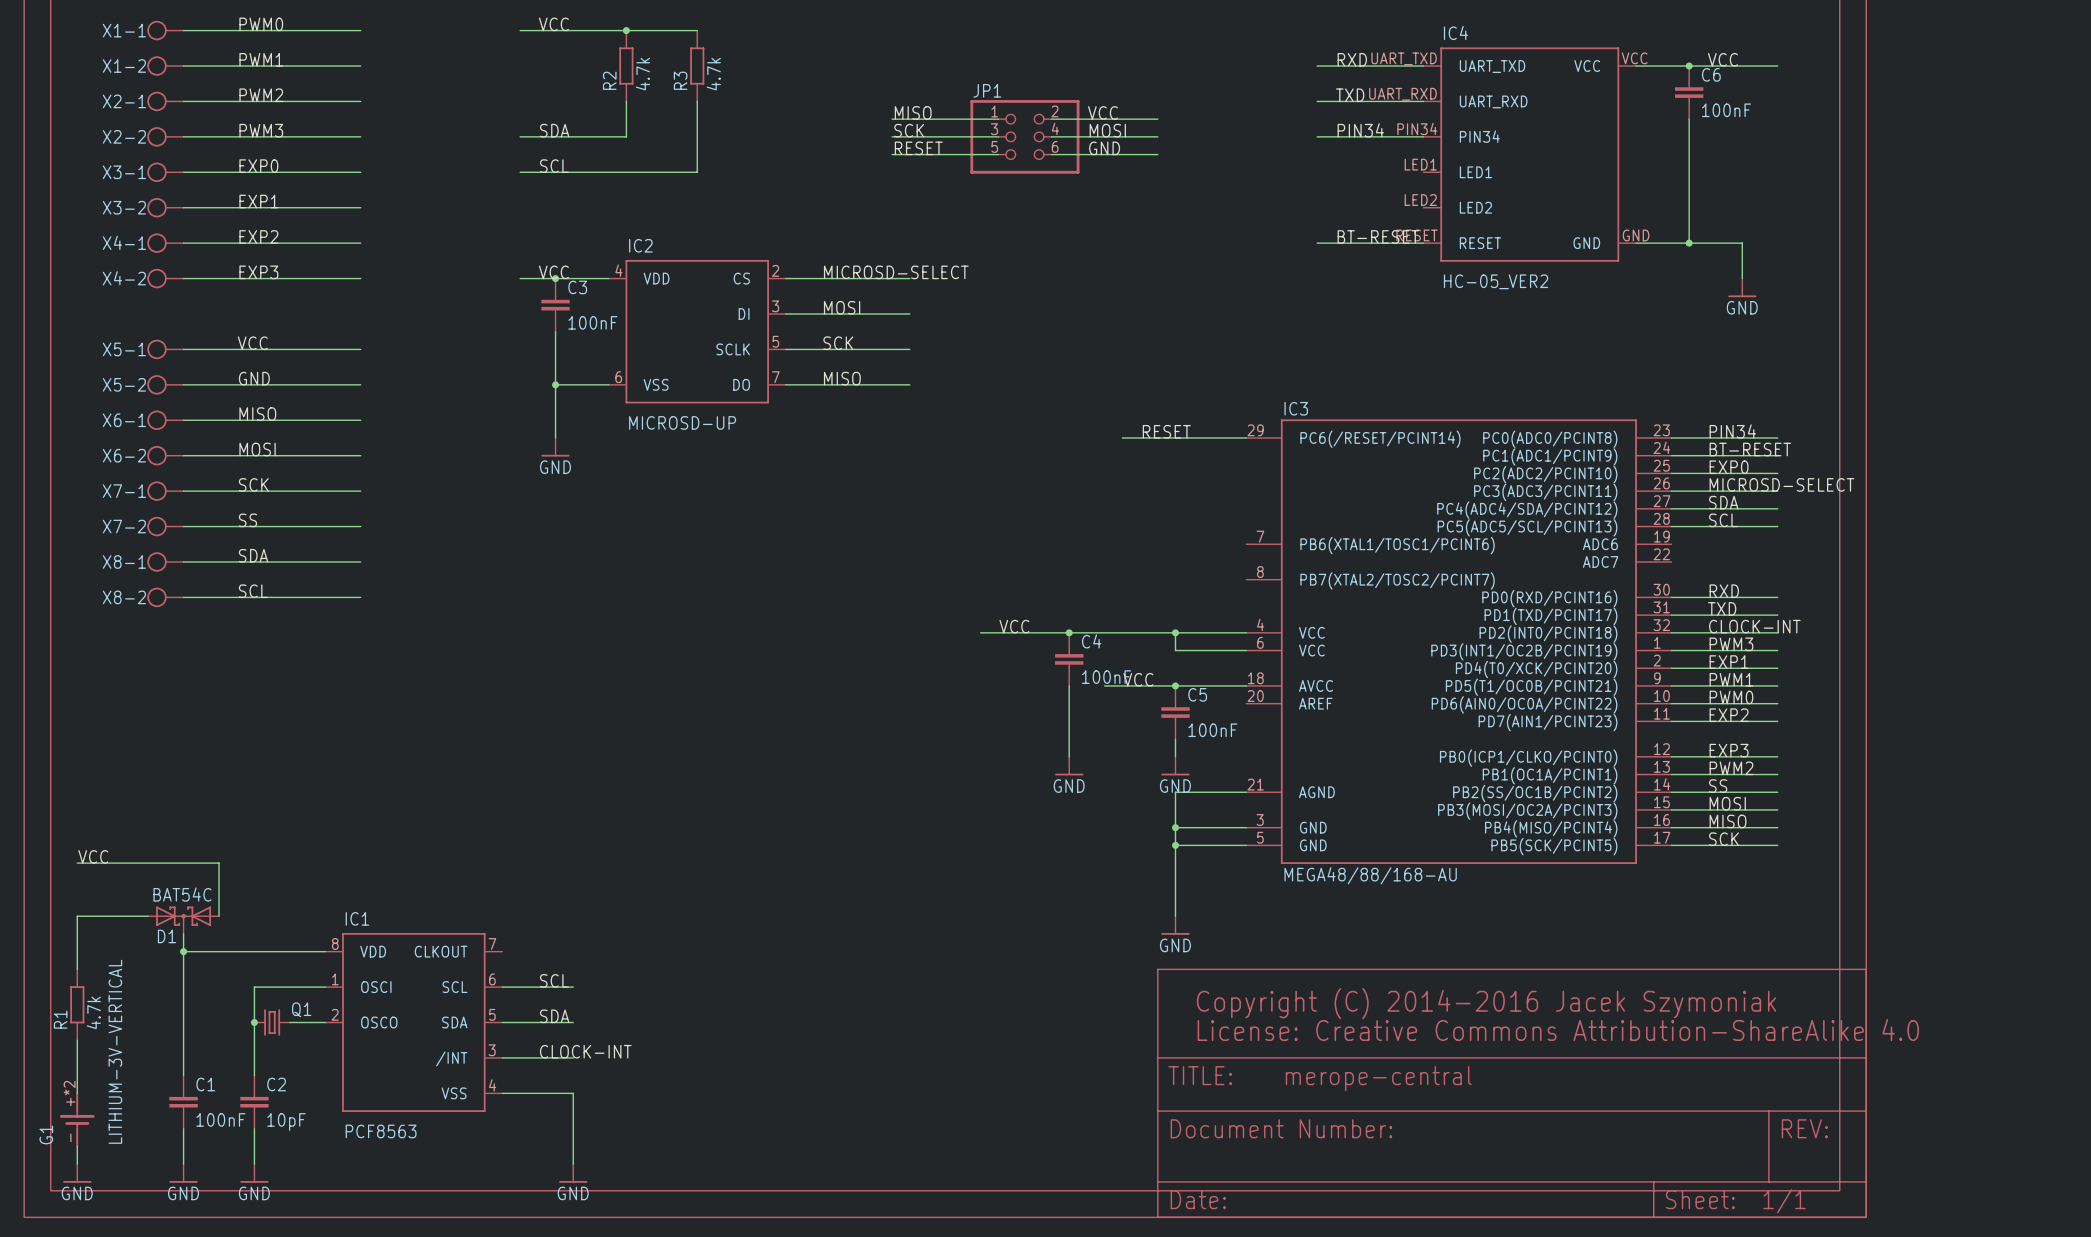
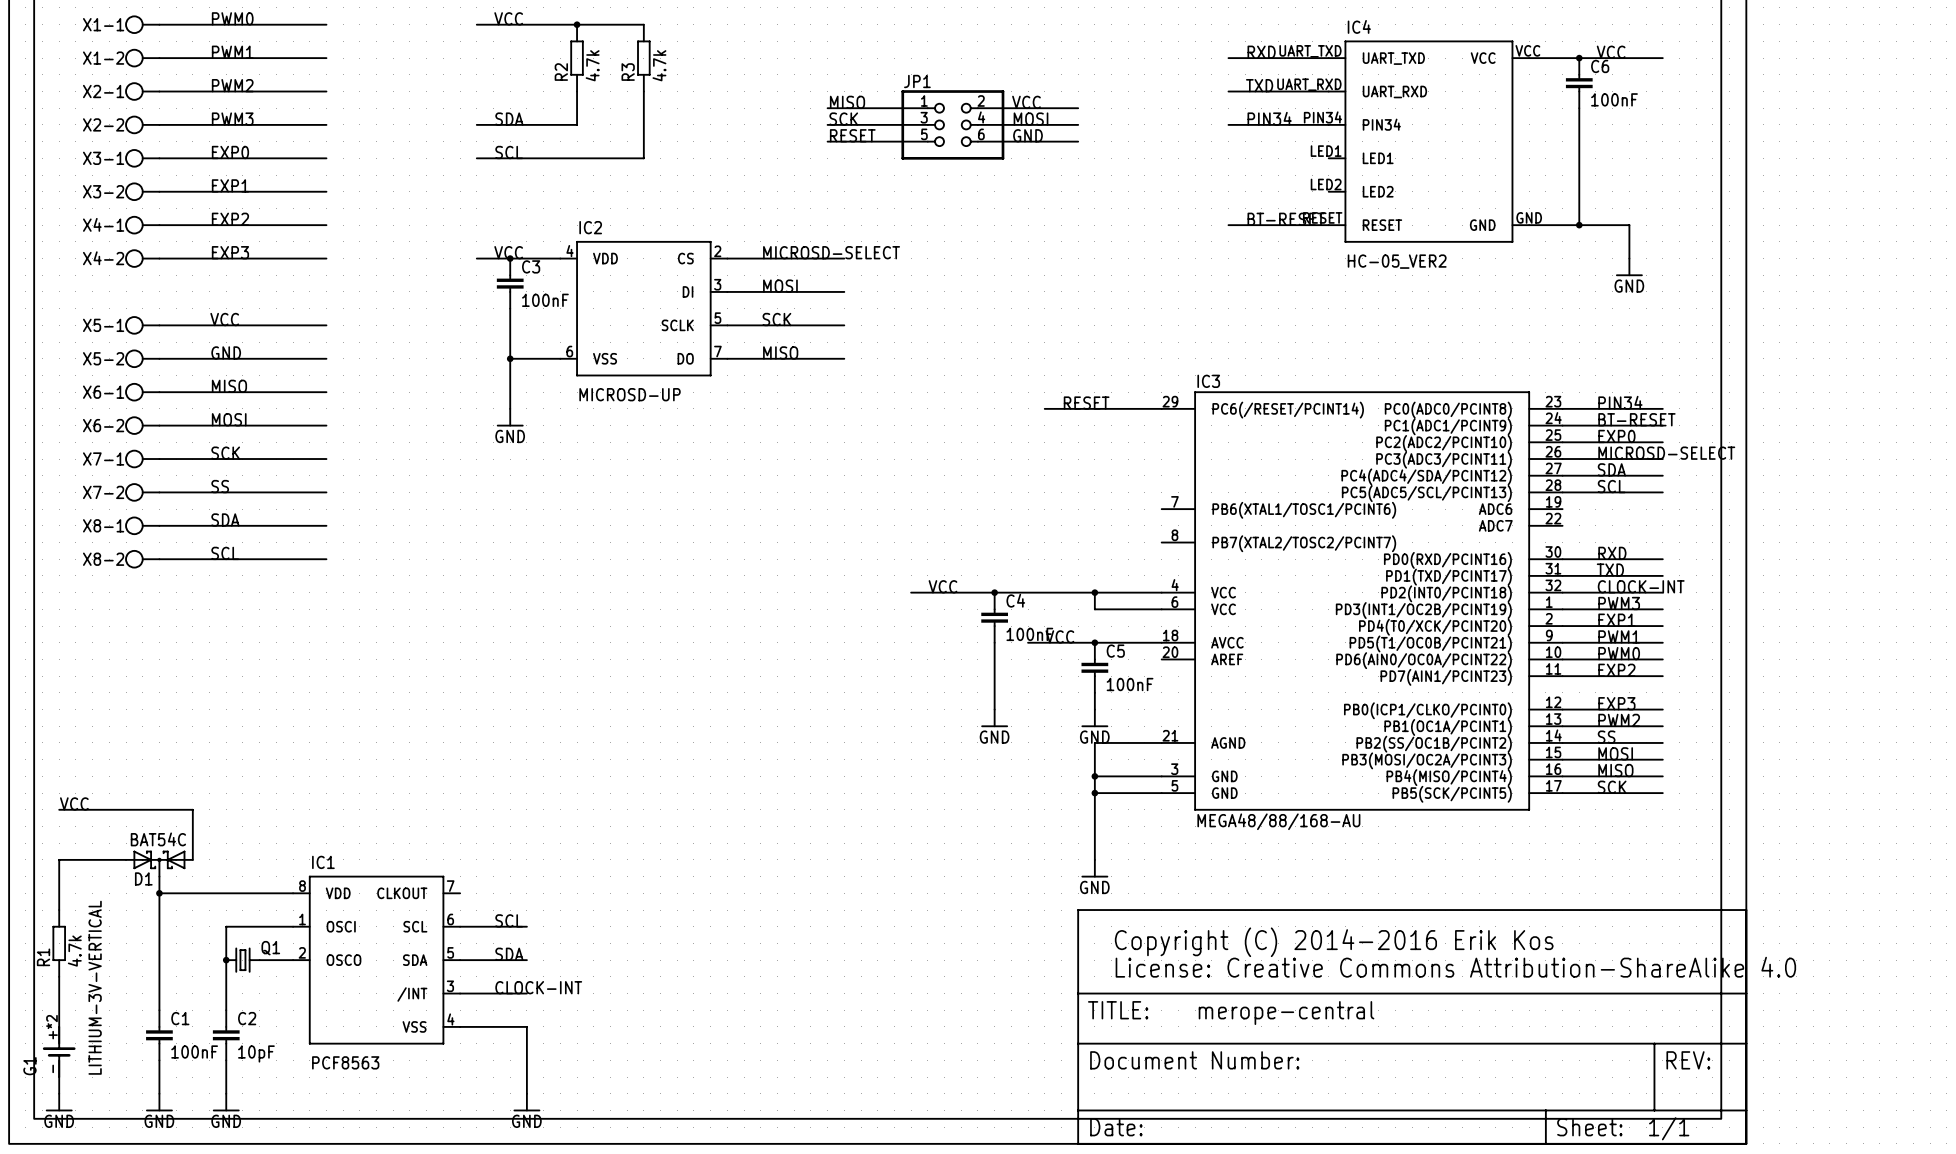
text: Copyright (C) 2014-2016 Jacek Szymoniak (1486, 1003) -> Copyright (C) 2014-2016 Erik Kos (1334, 942)

